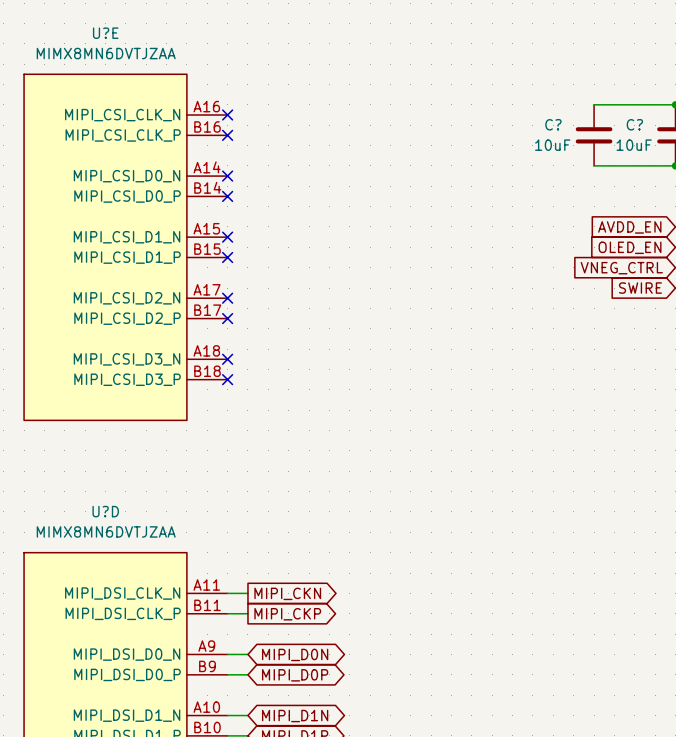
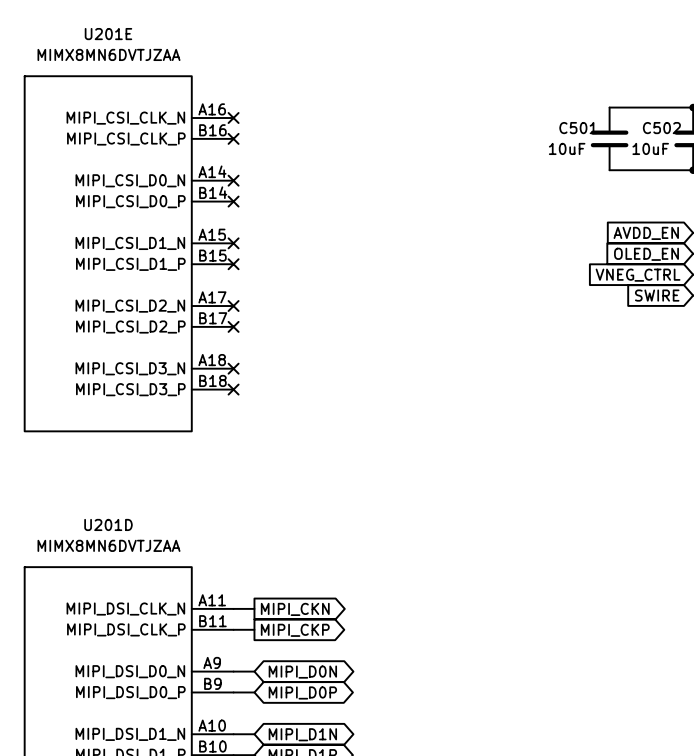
U?E name: U?E (105, 33) -> U201E (108, 34)
C? name: C? (553, 124) -> C501 (578, 128)
C? name: C? (634, 124) -> C502 (661, 128)
U?D name: U?D (105, 511) -> U201D (108, 524)

